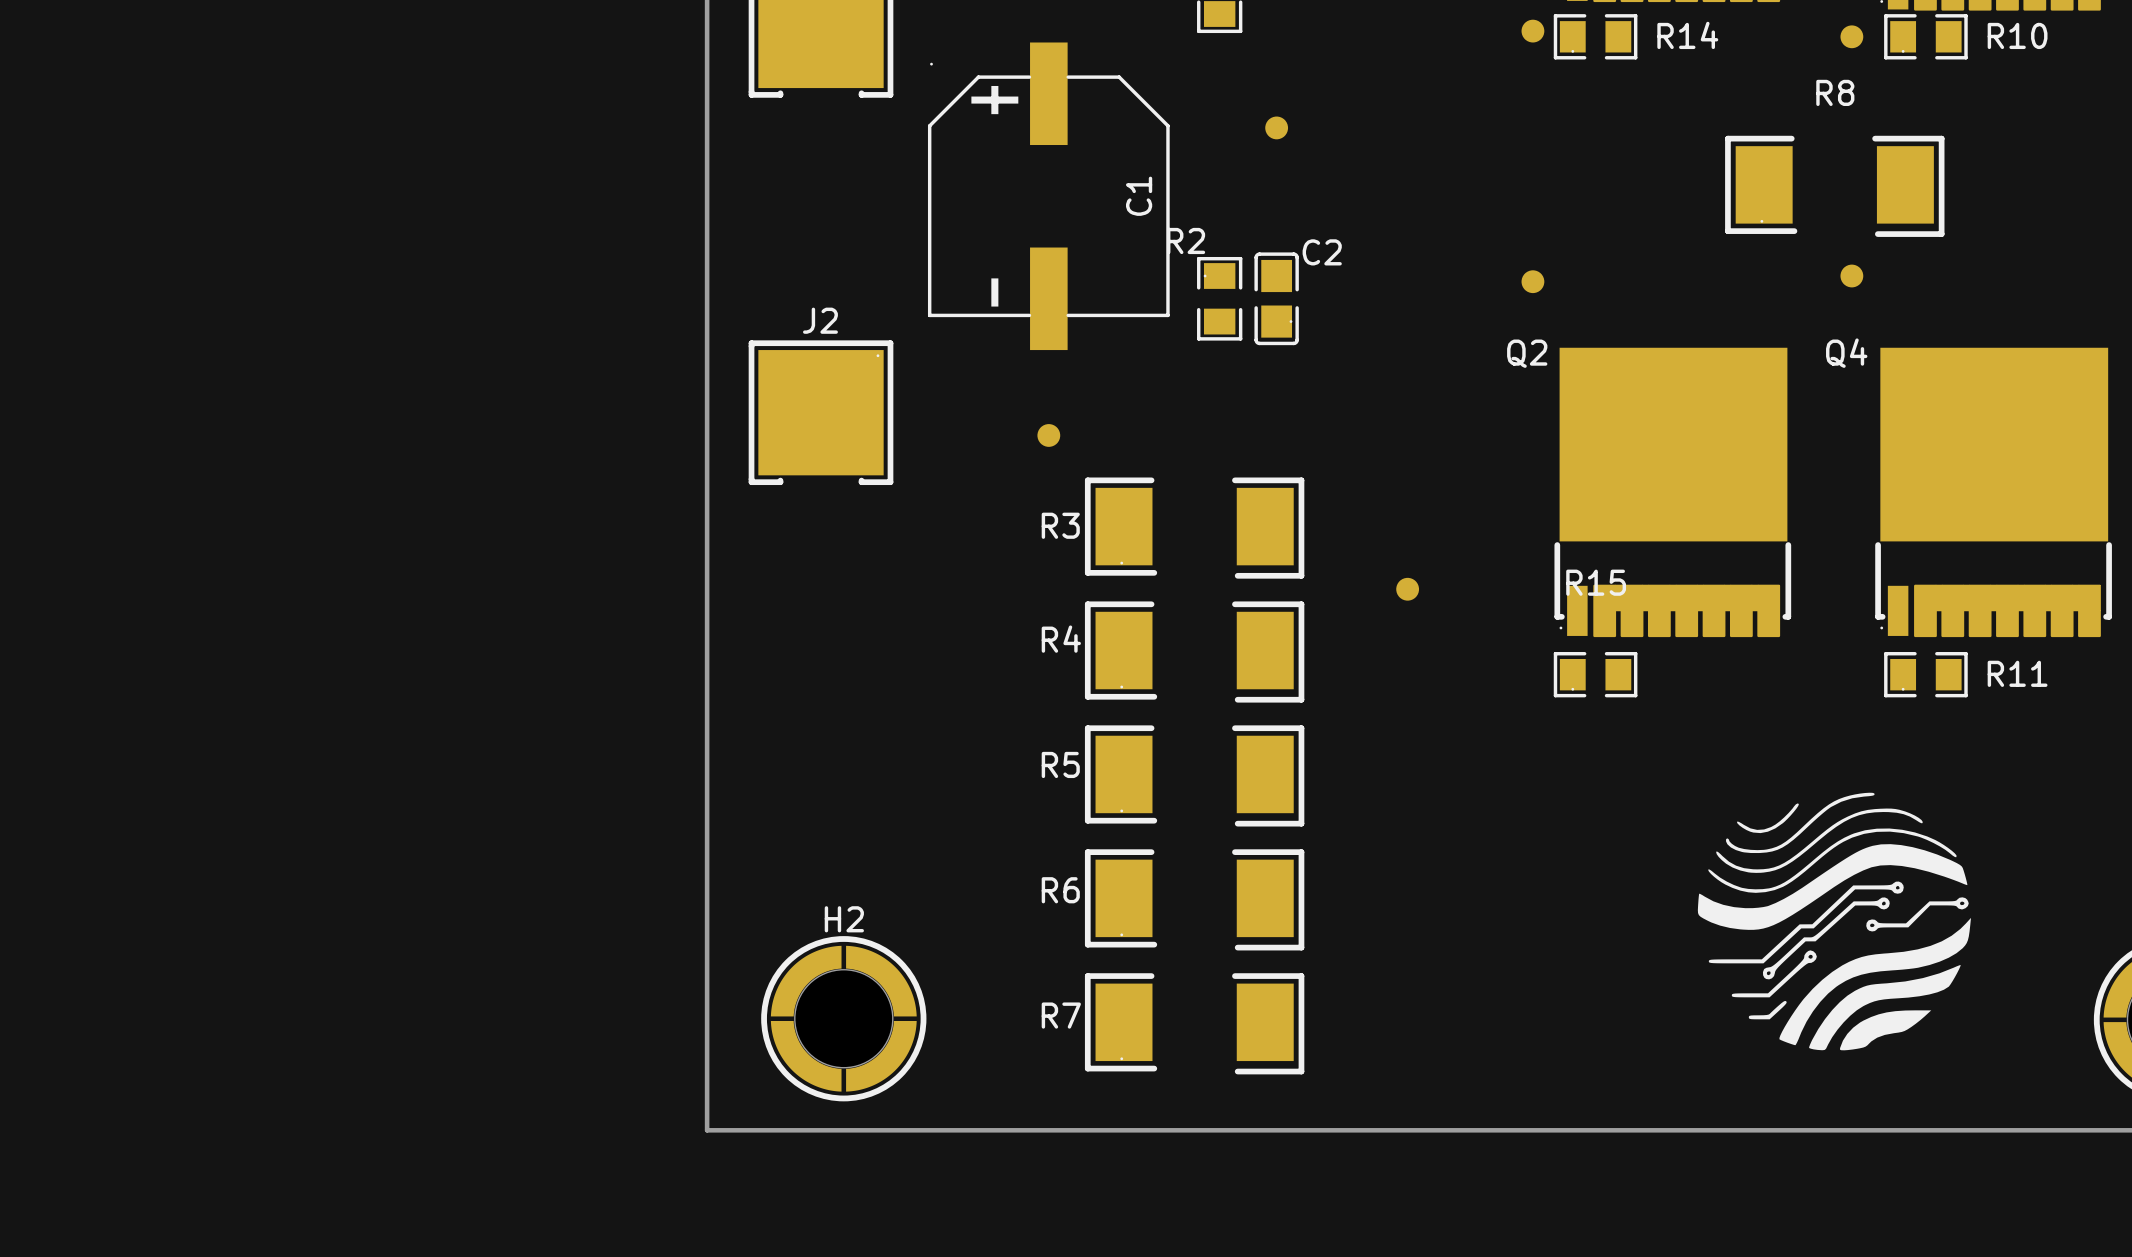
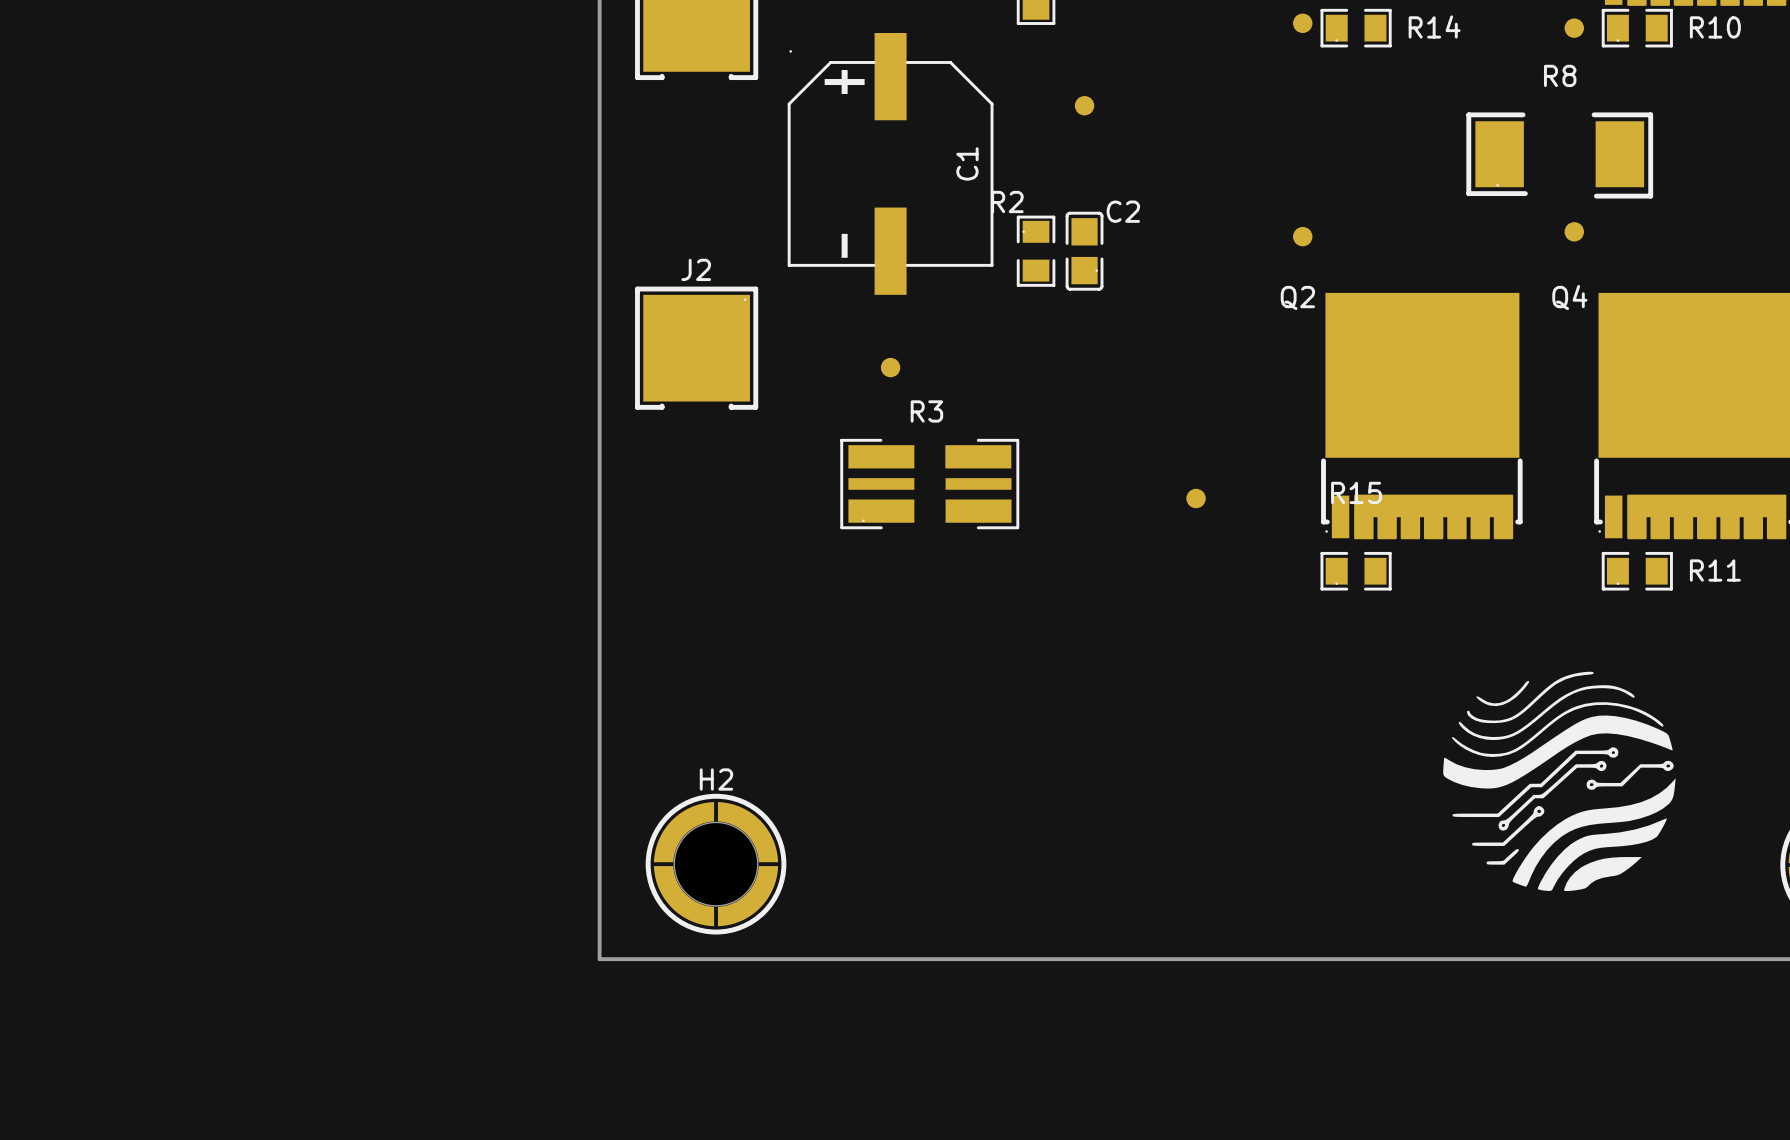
R3 footprint: [1084, 477, 1305, 579] -> [840, 438, 1020, 530]
R3 name position: R3 (1060, 525) -> R3 (926, 411)
R4: (1194, 652) -> none
R5: (1194, 775) -> none
R6: (1194, 899) -> none
R7: (1194, 1023) -> none

